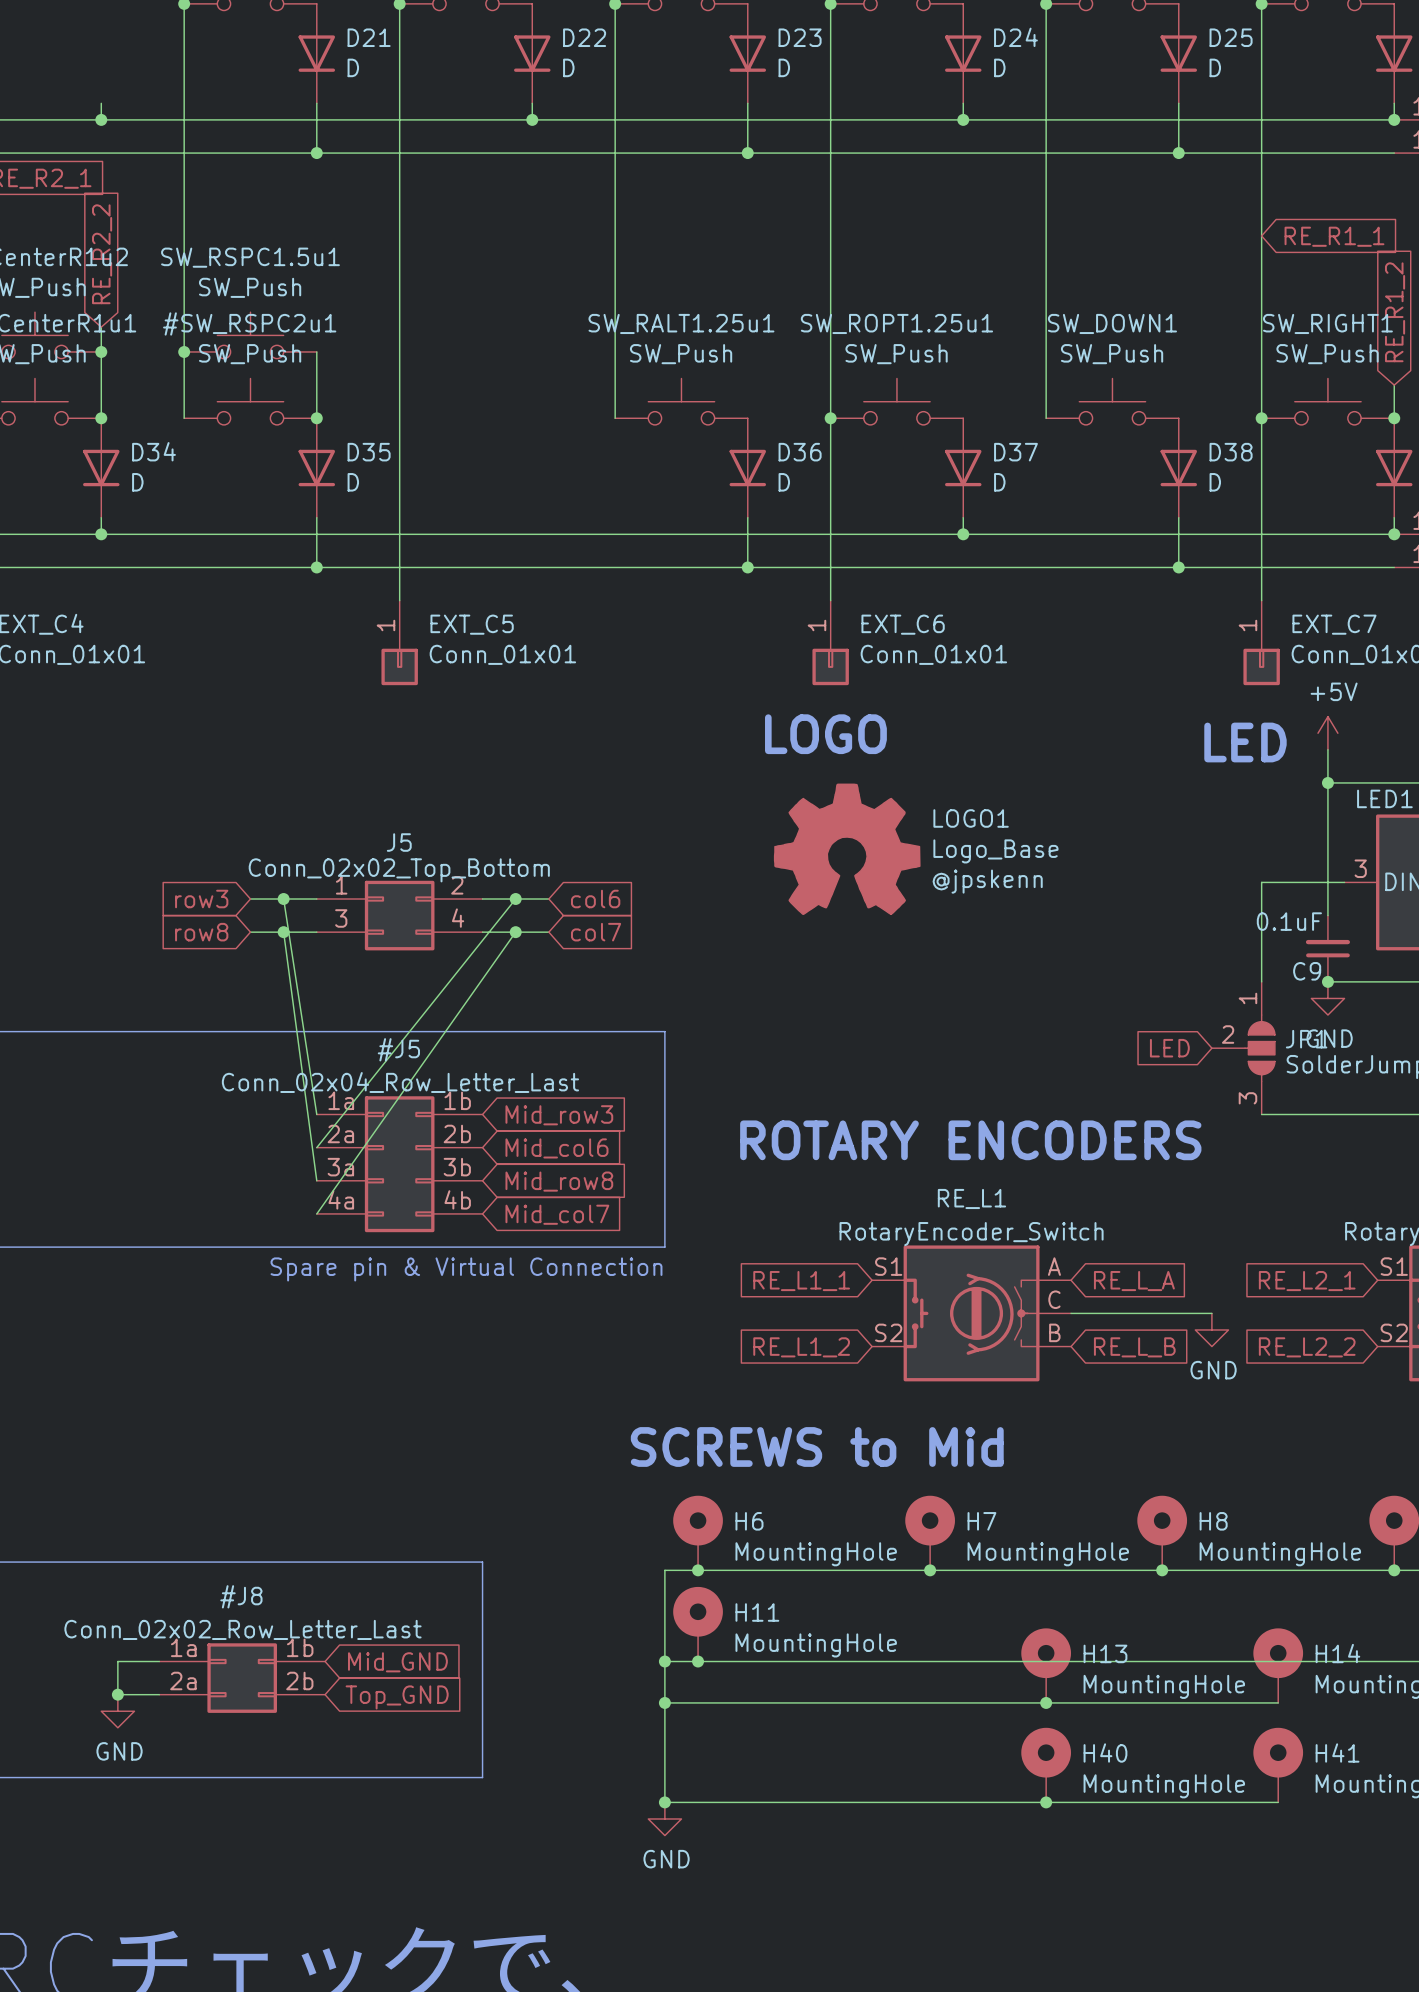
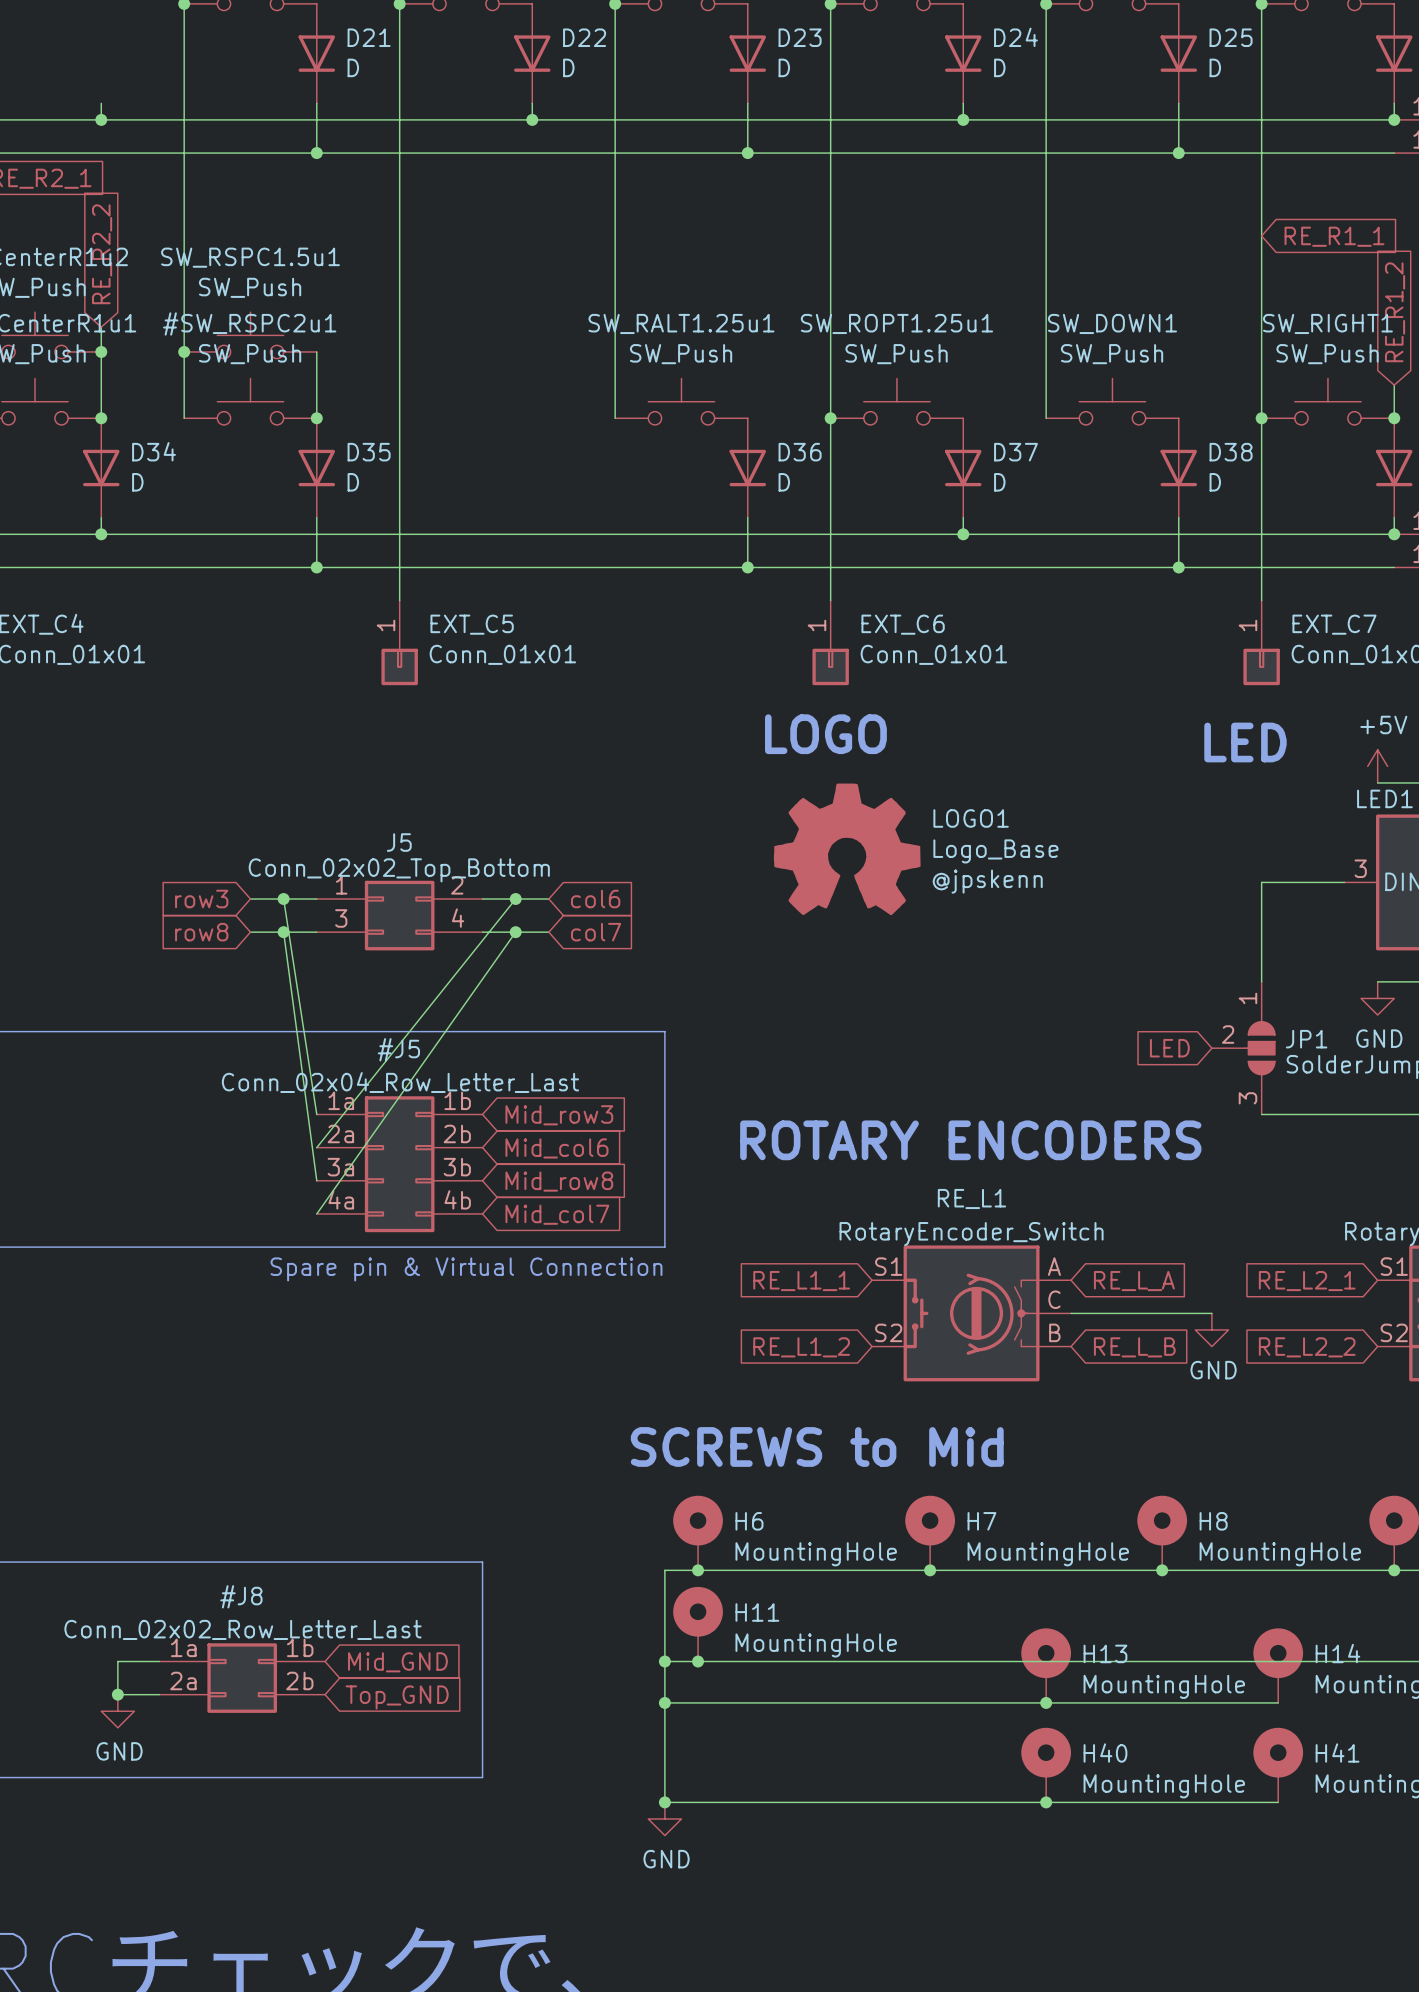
power symbol position: +5V (1327, 733) -> +5V (1377, 766)
wire: (1327, 749) (1327, 915) -> none
wire: (1327, 782) (1377, 782) -> none
junction: (1327, 782) -> none
C9: 0.1uF (1327, 948) -> none
wire: (1327, 981) (1377, 981) -> none
junction: (1327, 981) -> none
power symbol position: GND (1327, 998) -> GND (1377, 998)

